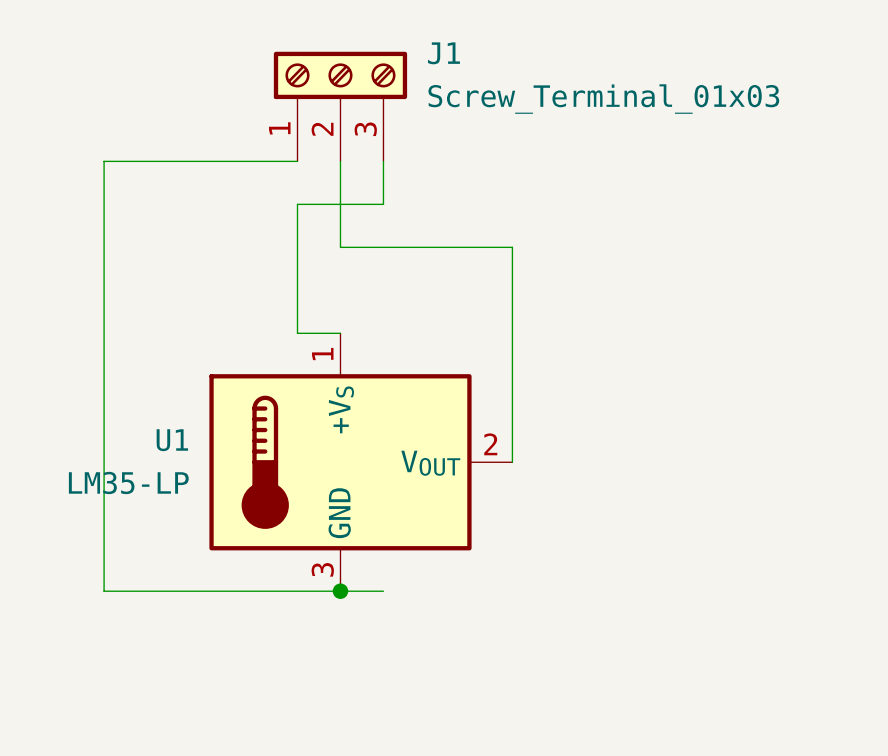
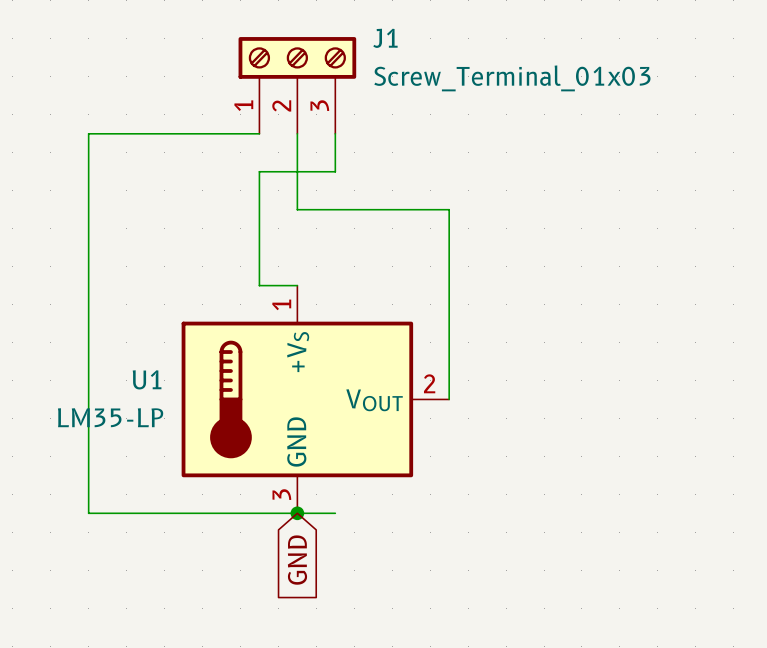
global label: none -> GND (297, 560)

